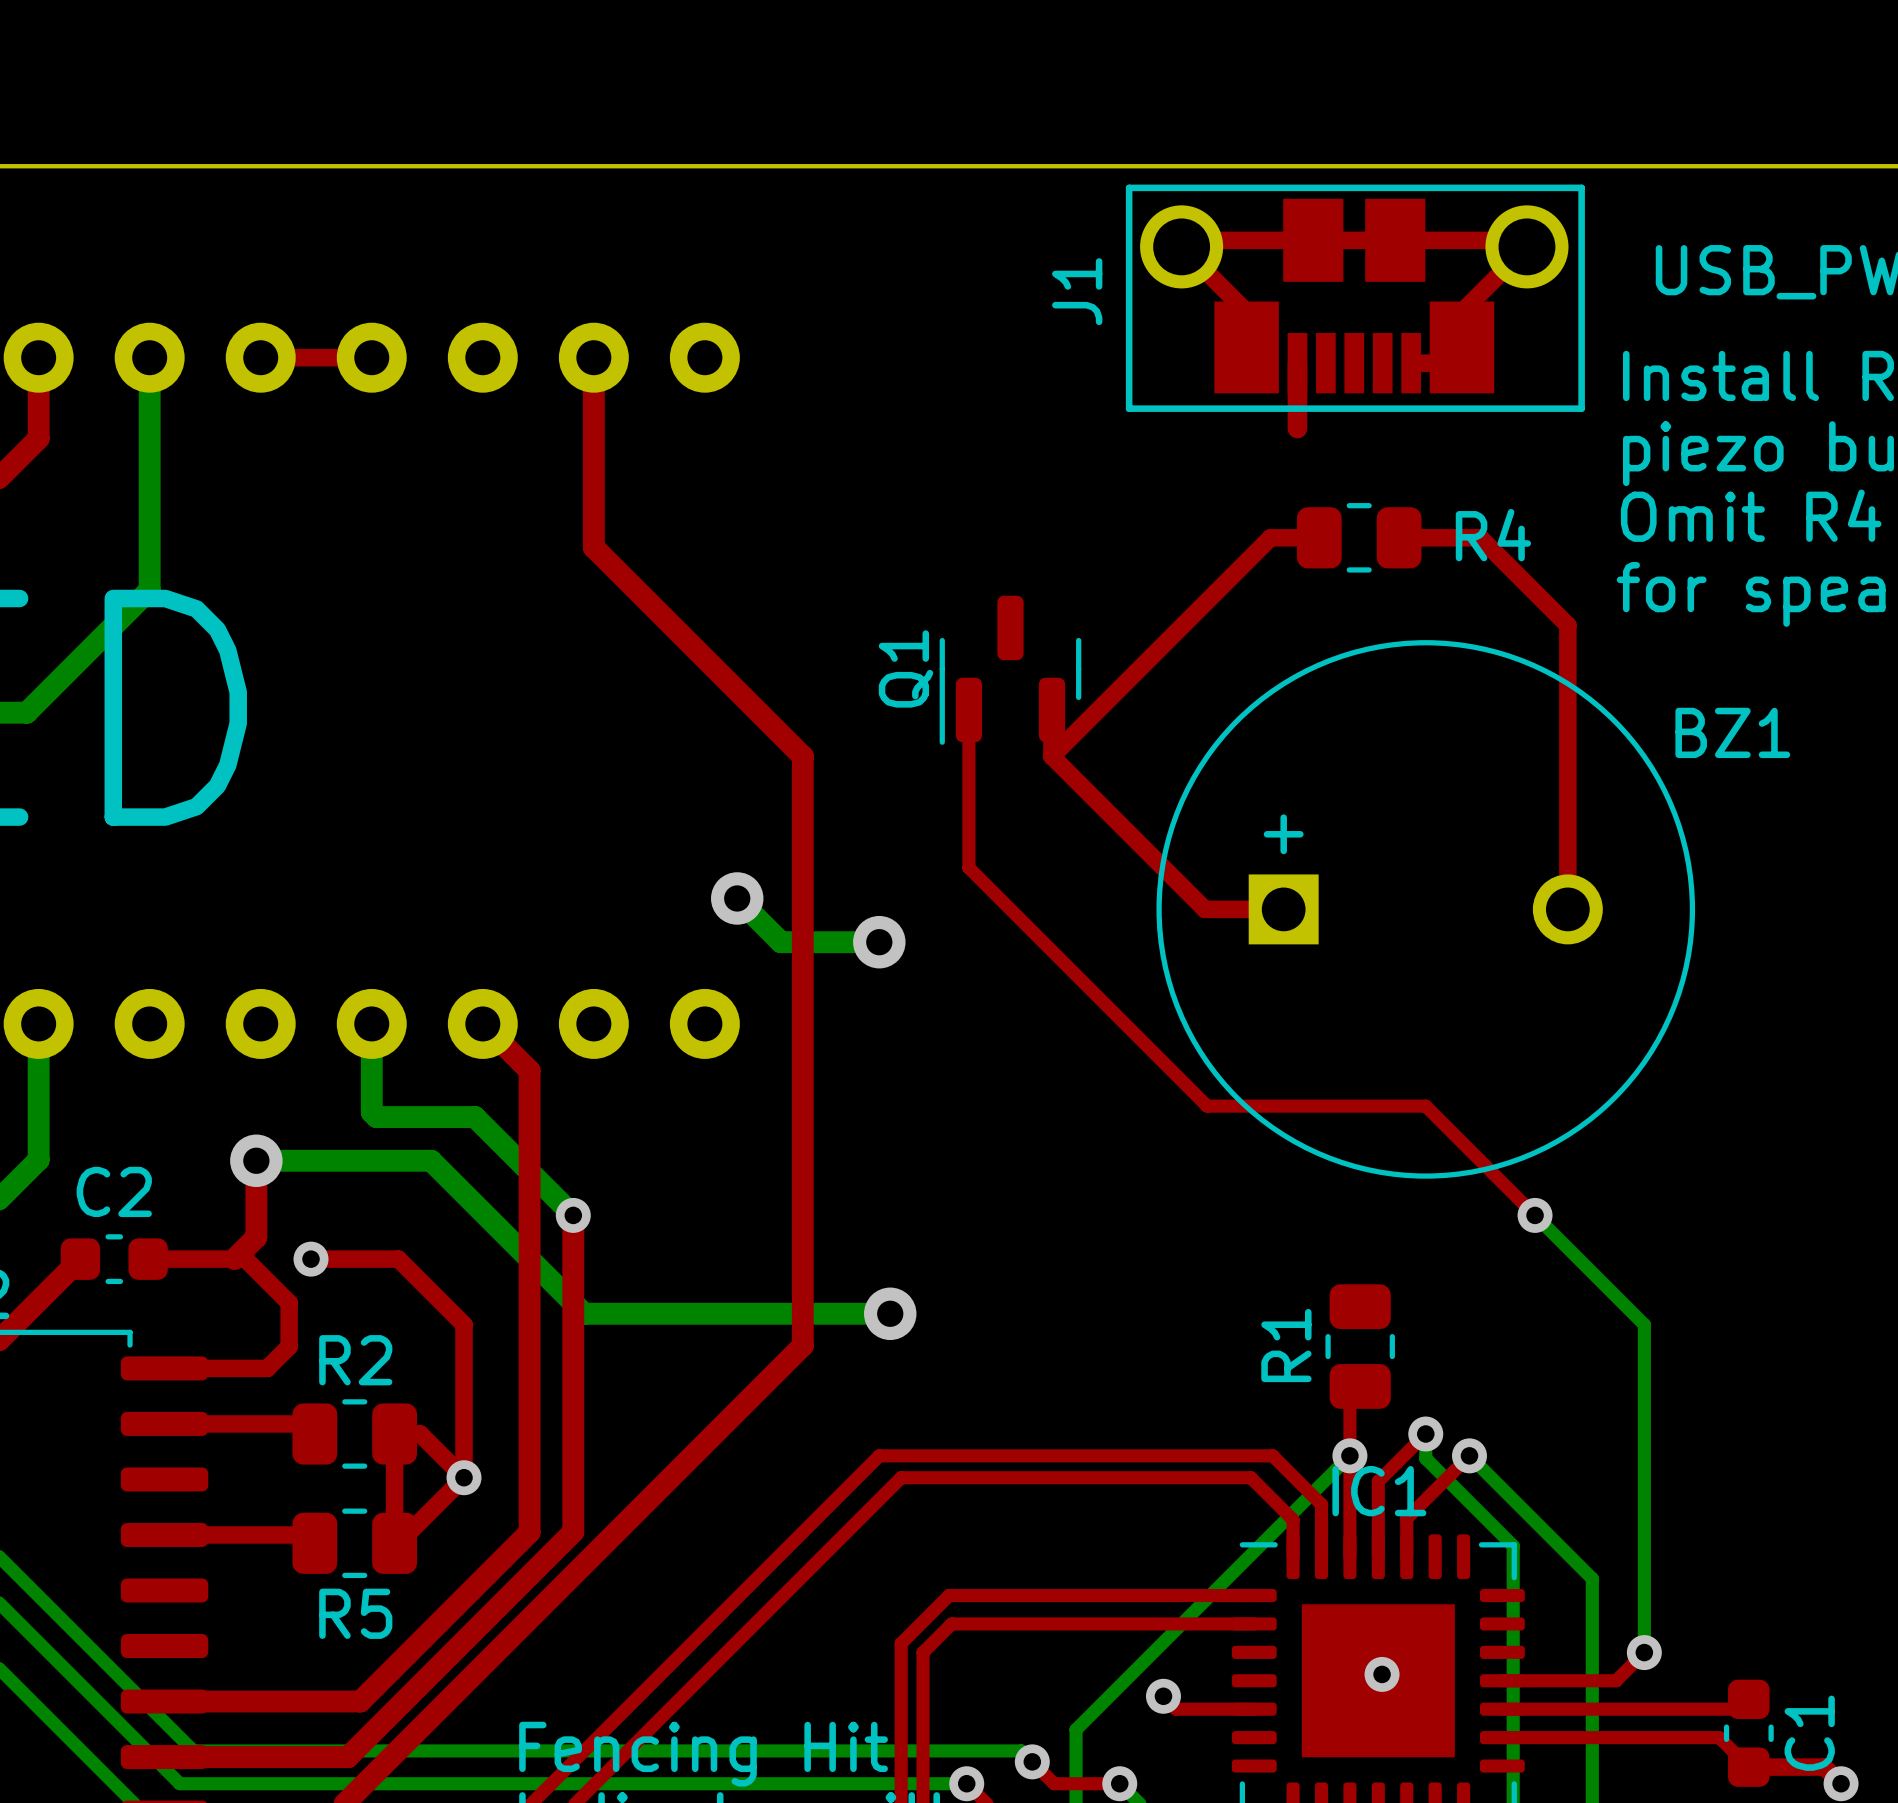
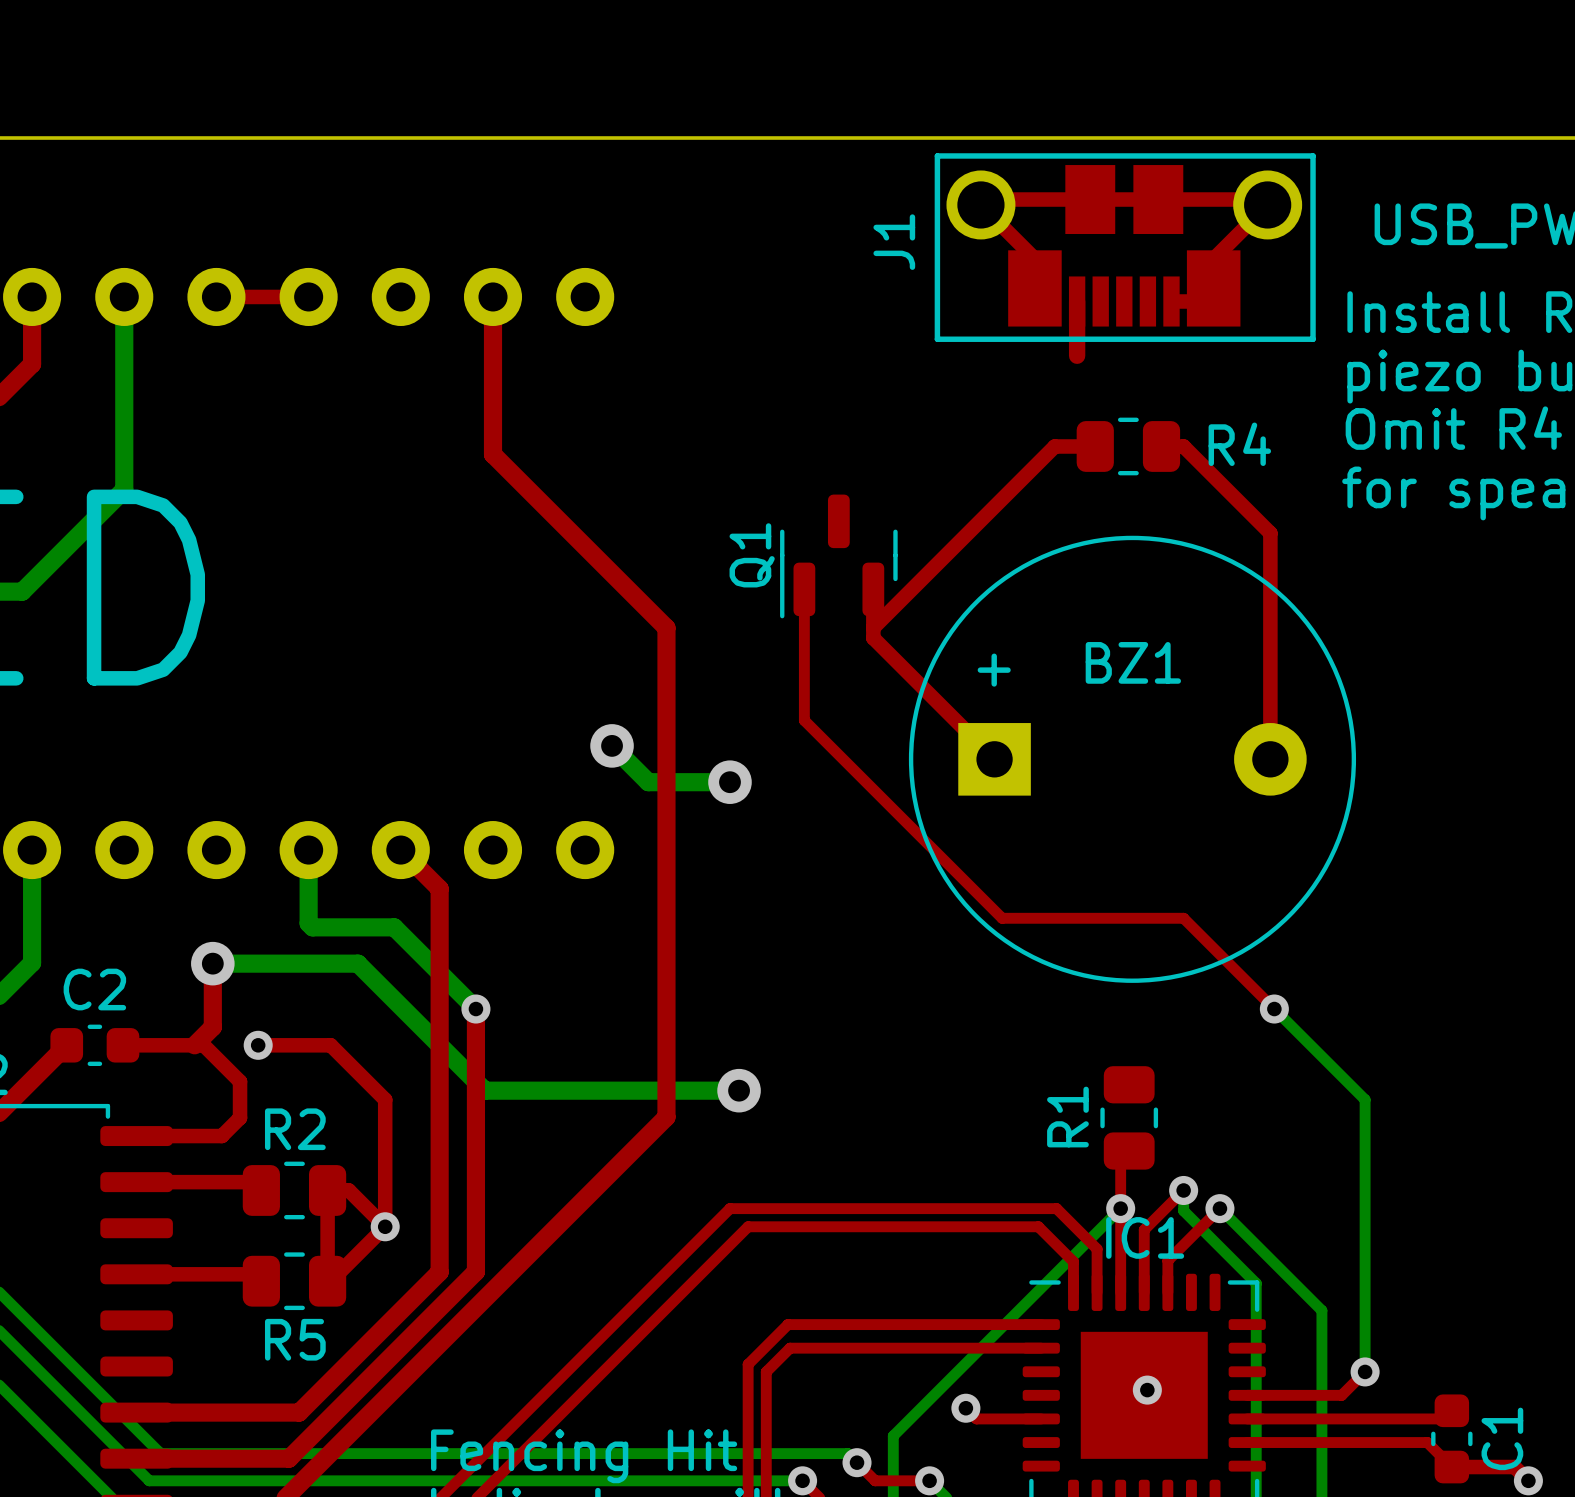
top track: (1425, 537) (1480, 537) (1567, 625) (1567, 909) -> (1183, 446) (1270, 533) (1270, 759)
BZ1 footprint: [1156, 640, 1696, 1179] -> [908, 535, 1357, 983]
BZ1 name position: BZ1 (1732, 732) -> BZ1 (1133, 662)
top track: (1051, 756) (1204, 909) (1283, 909) -> (873, 627) (873, 638) (994, 759)

